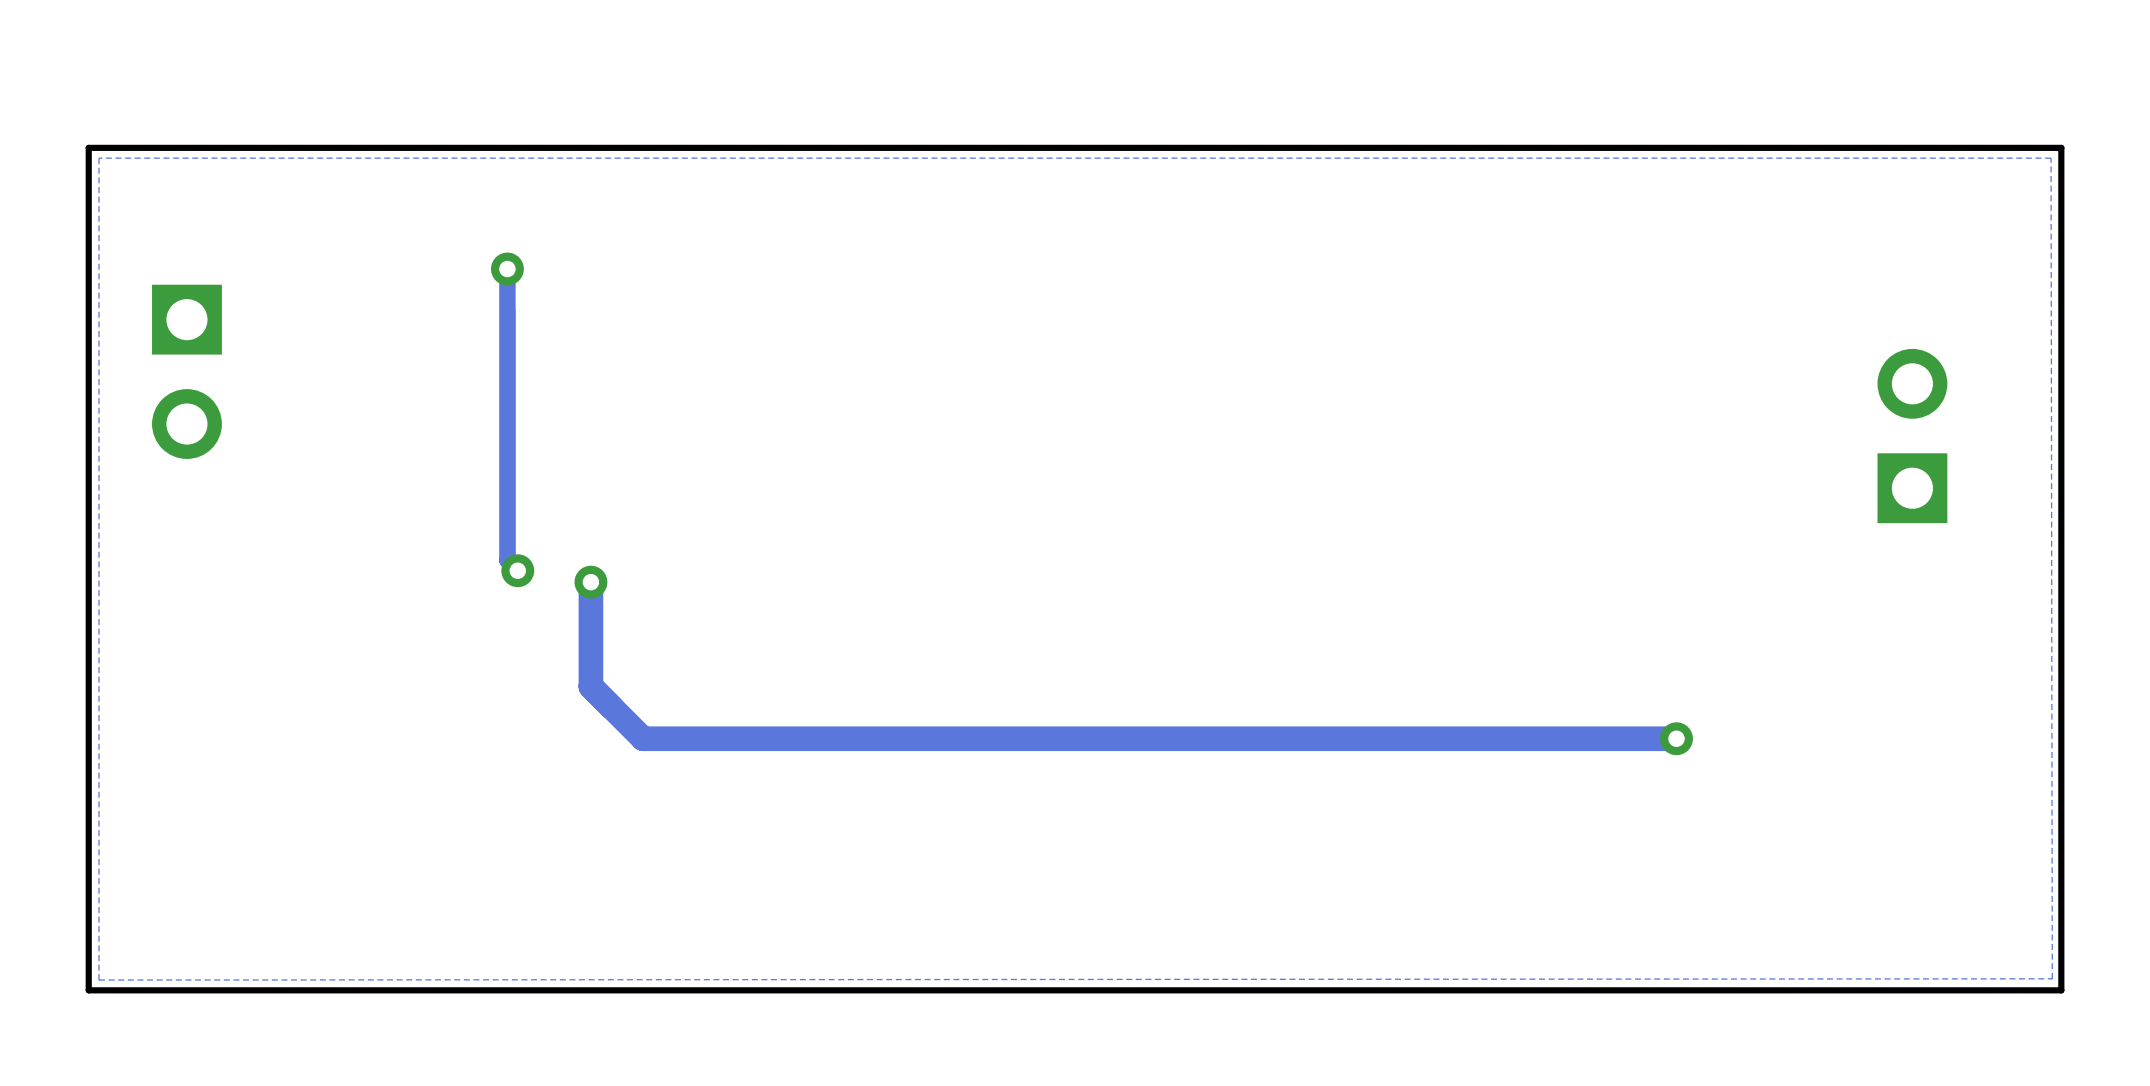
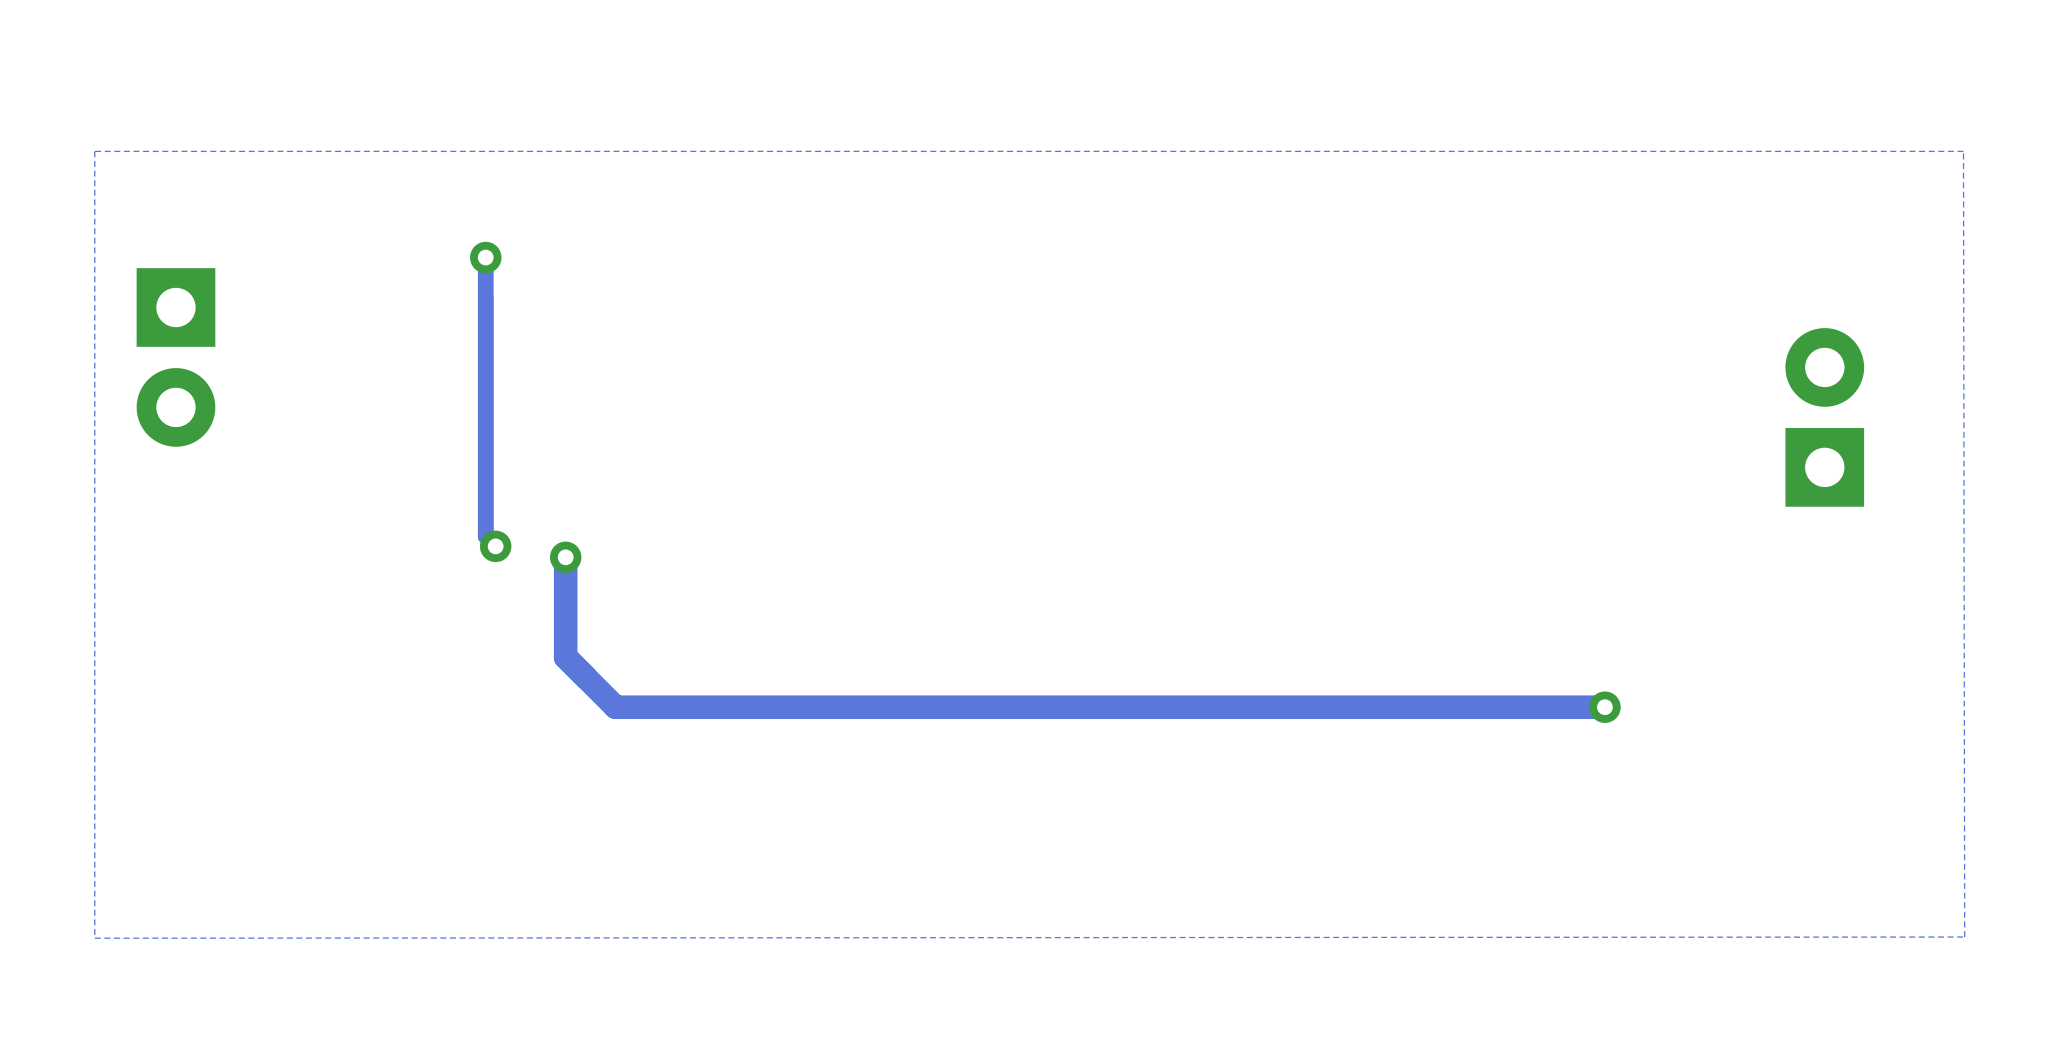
board edge: (2061, 147) (88, 147) (88, 990) (2061, 990) (2061, 147) -> none
part footprint: [152, 284, 222, 459] -> [136, 268, 216, 447]
part footprint: [1877, 348, 1948, 524] -> [1785, 328, 1865, 507]

